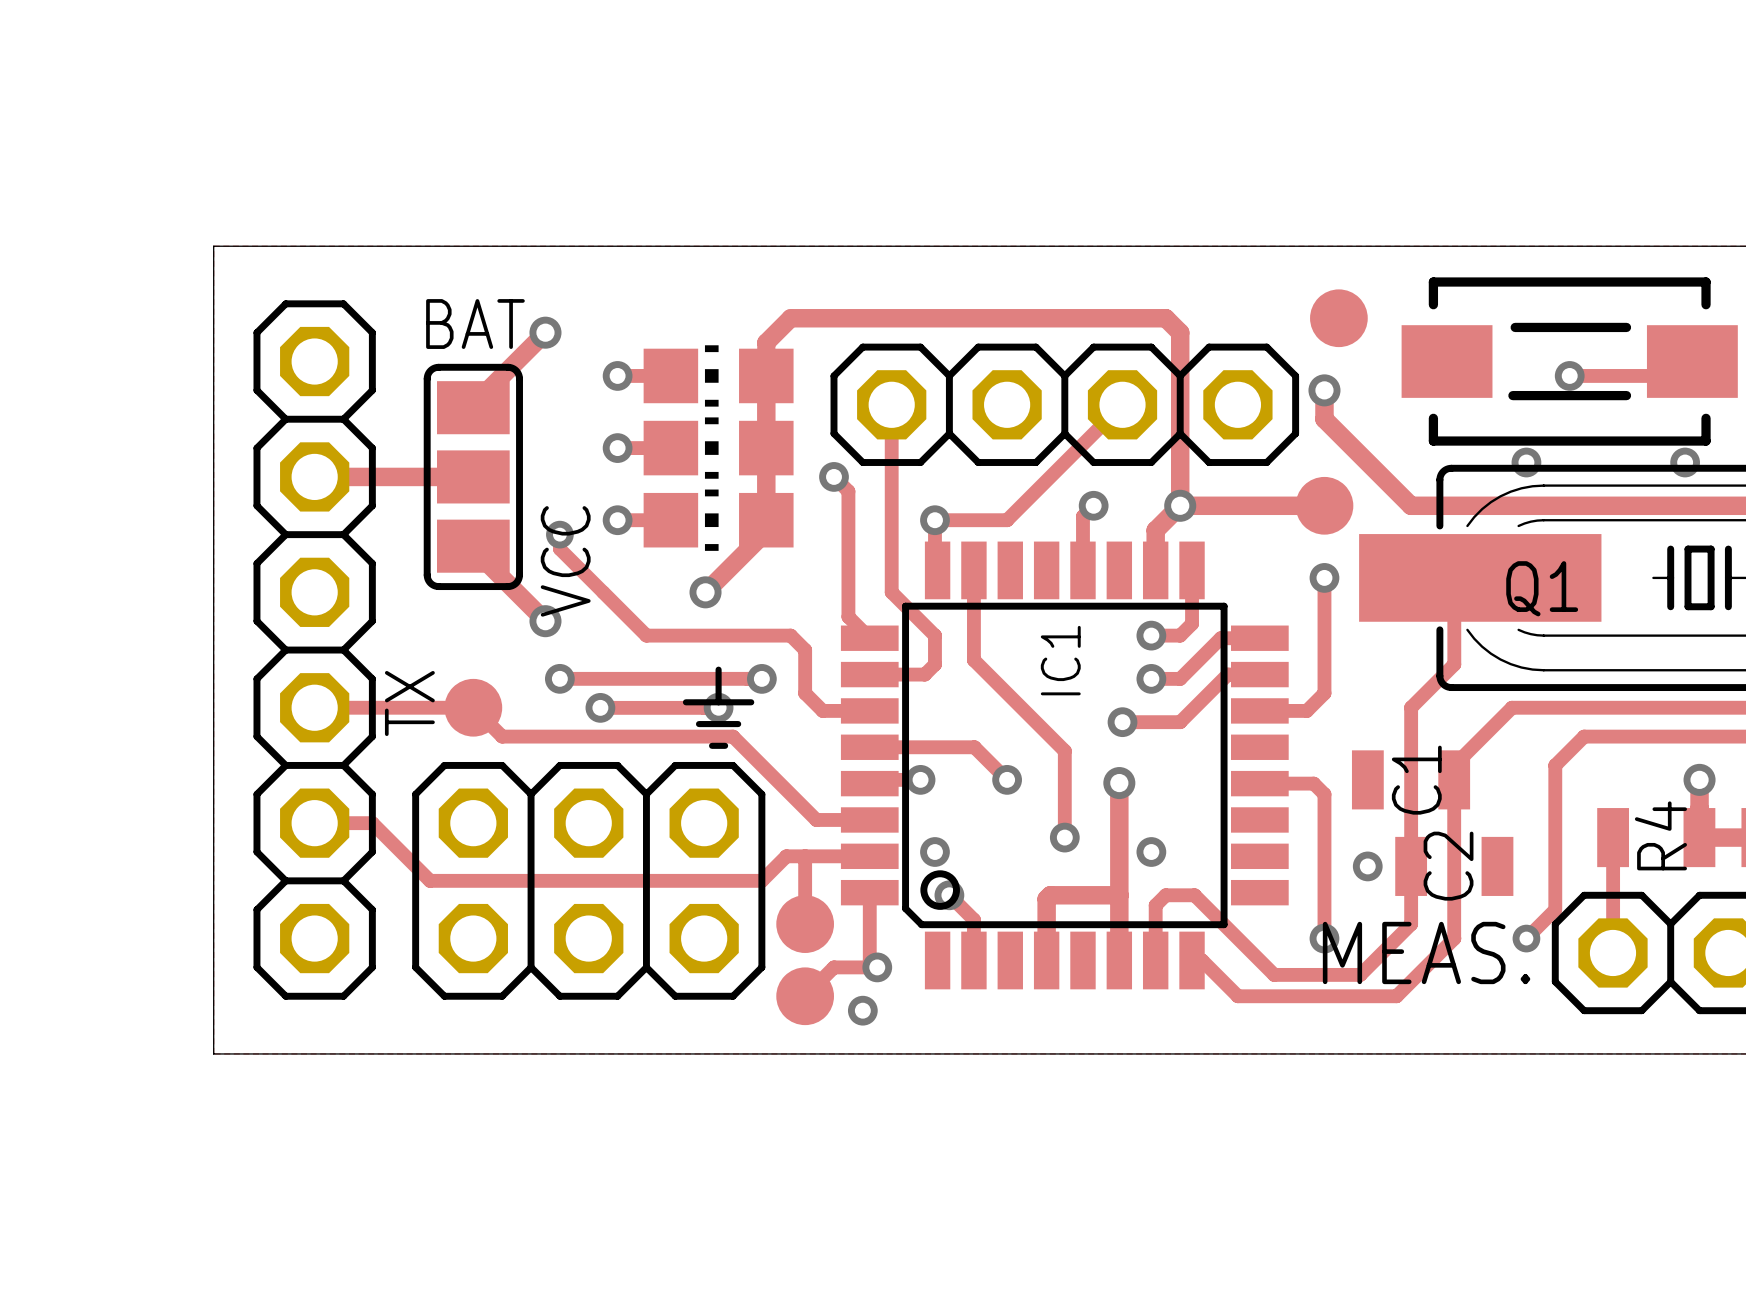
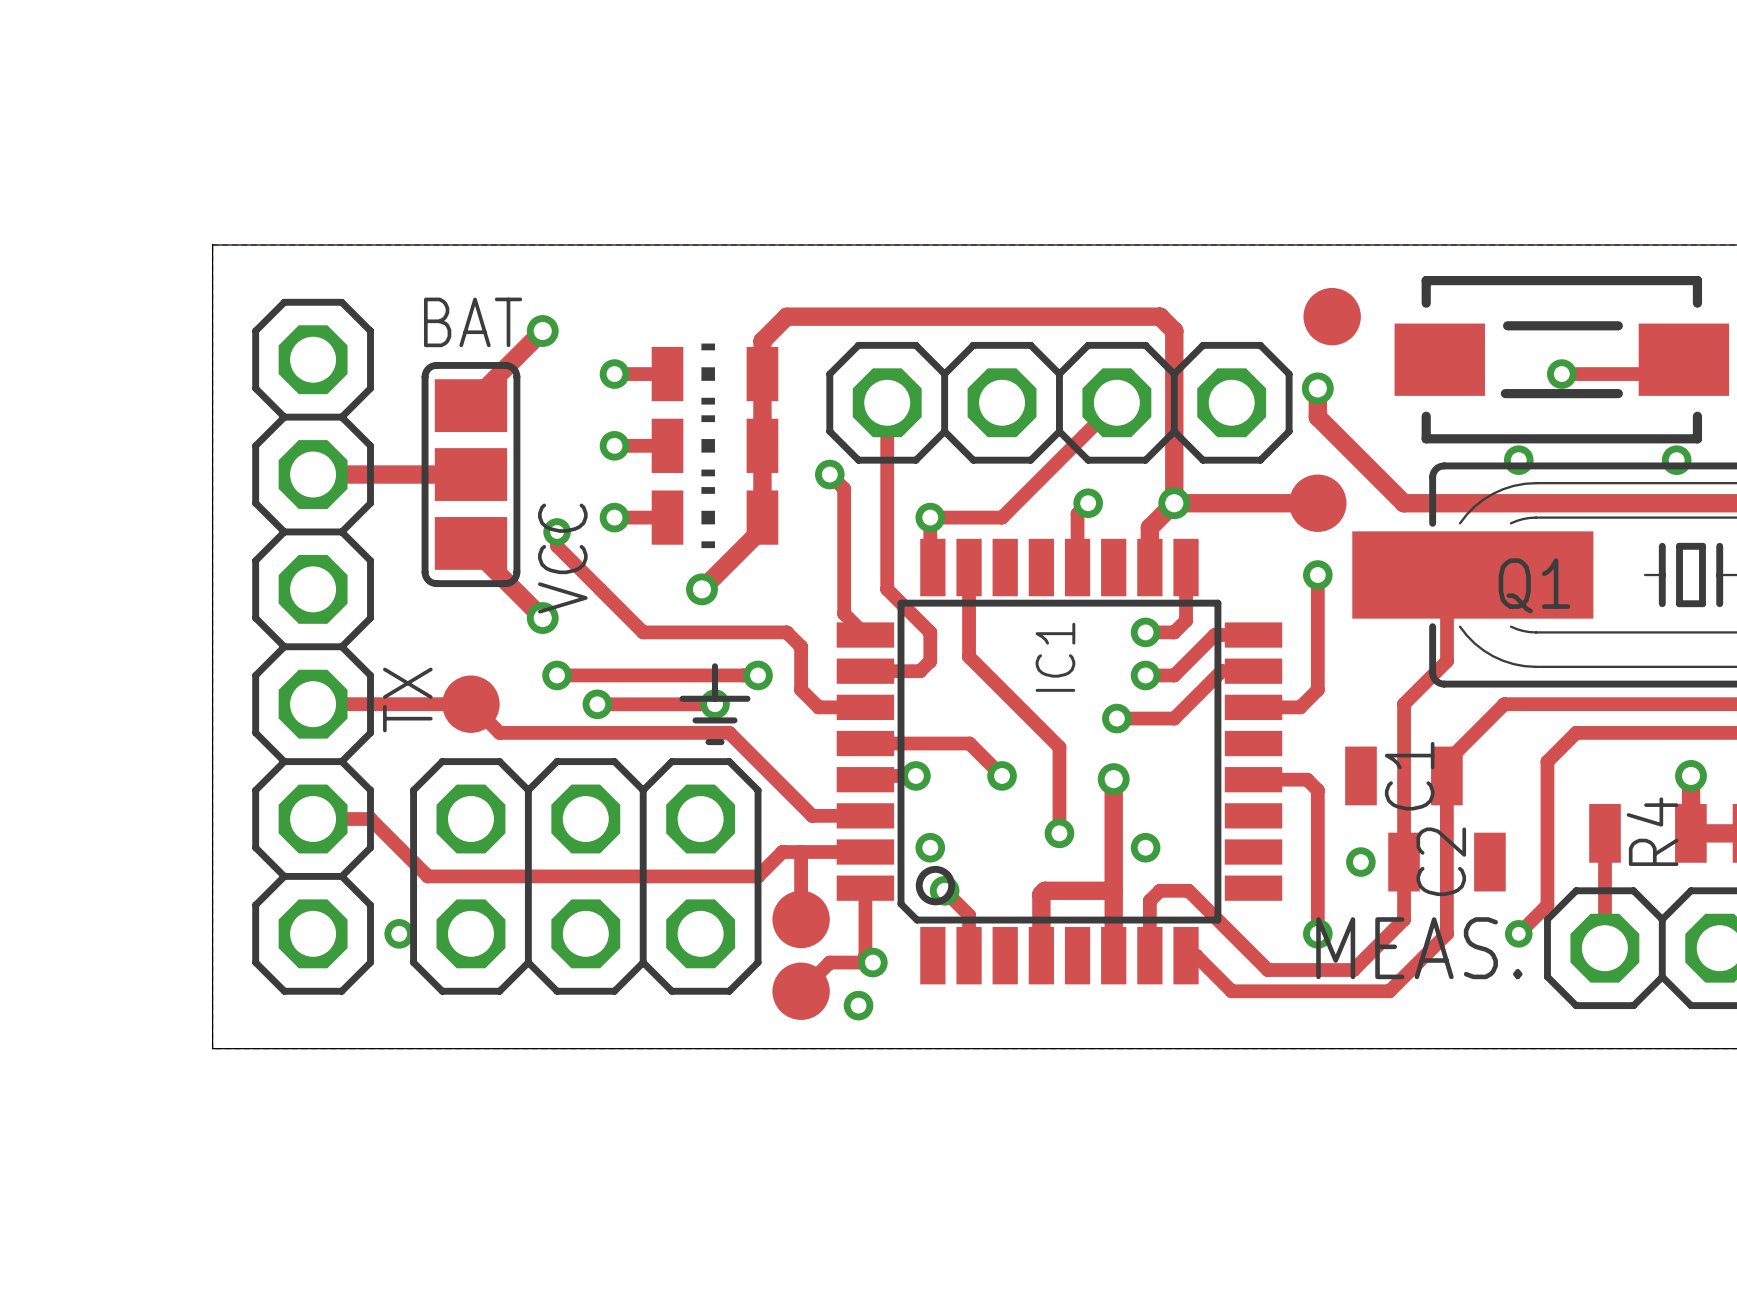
part footprint: [643, 345, 794, 407] -> [651, 343, 779, 405]
part footprint: [643, 417, 794, 479] -> [651, 415, 779, 477]
part footprint: [643, 489, 794, 551] -> [651, 487, 779, 549]
via: none -> (399, 933)

